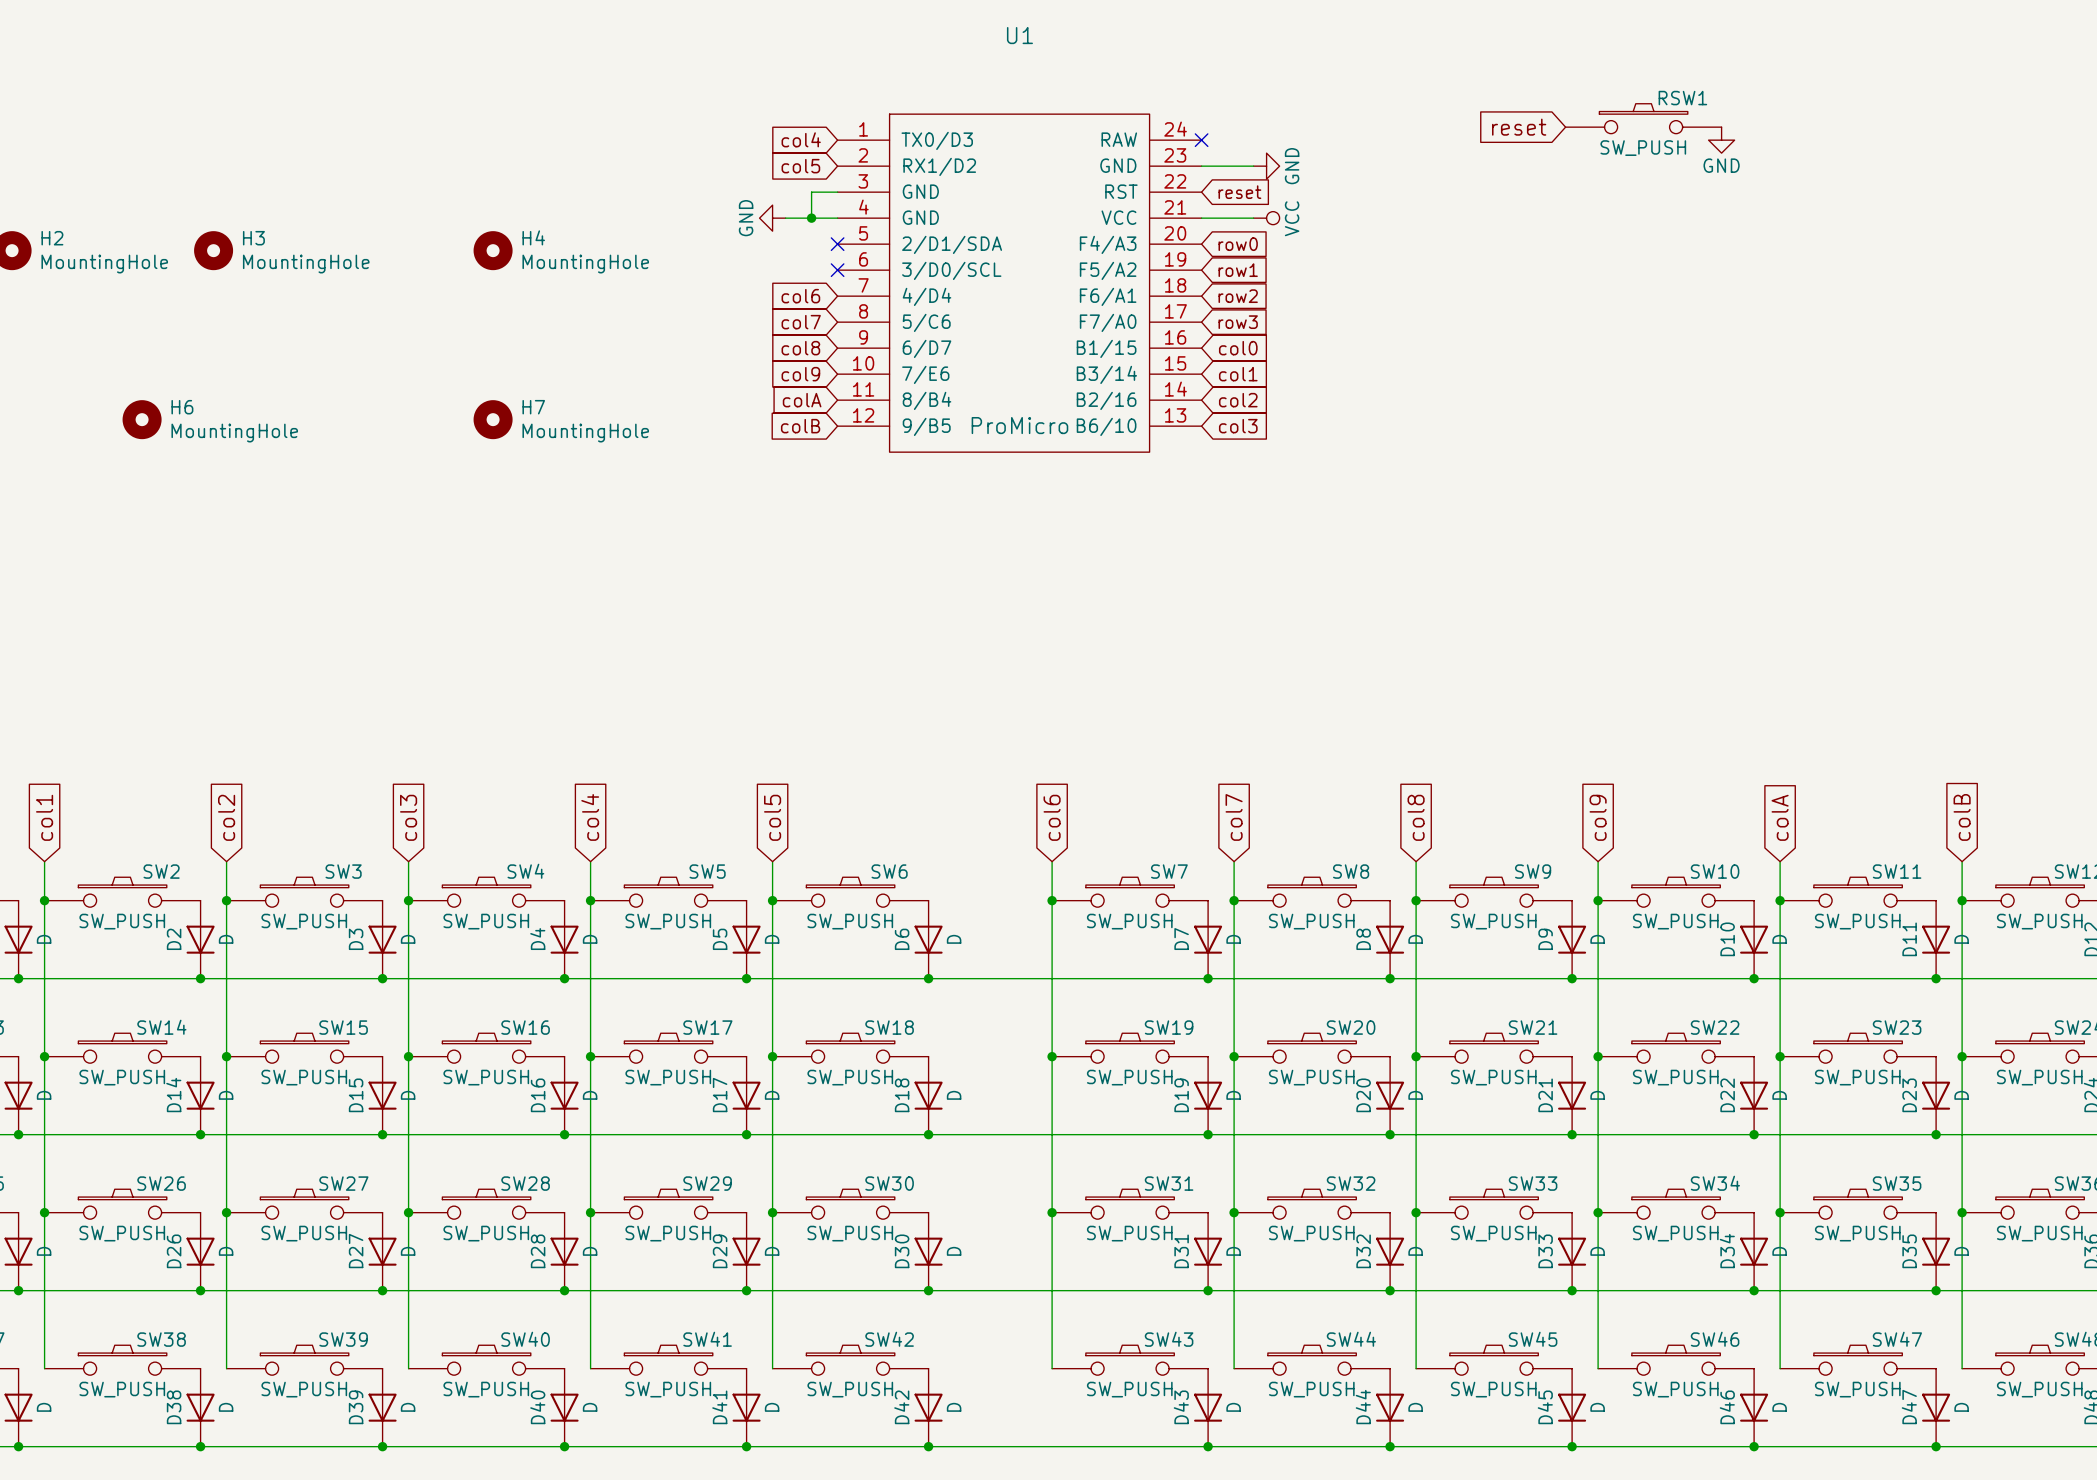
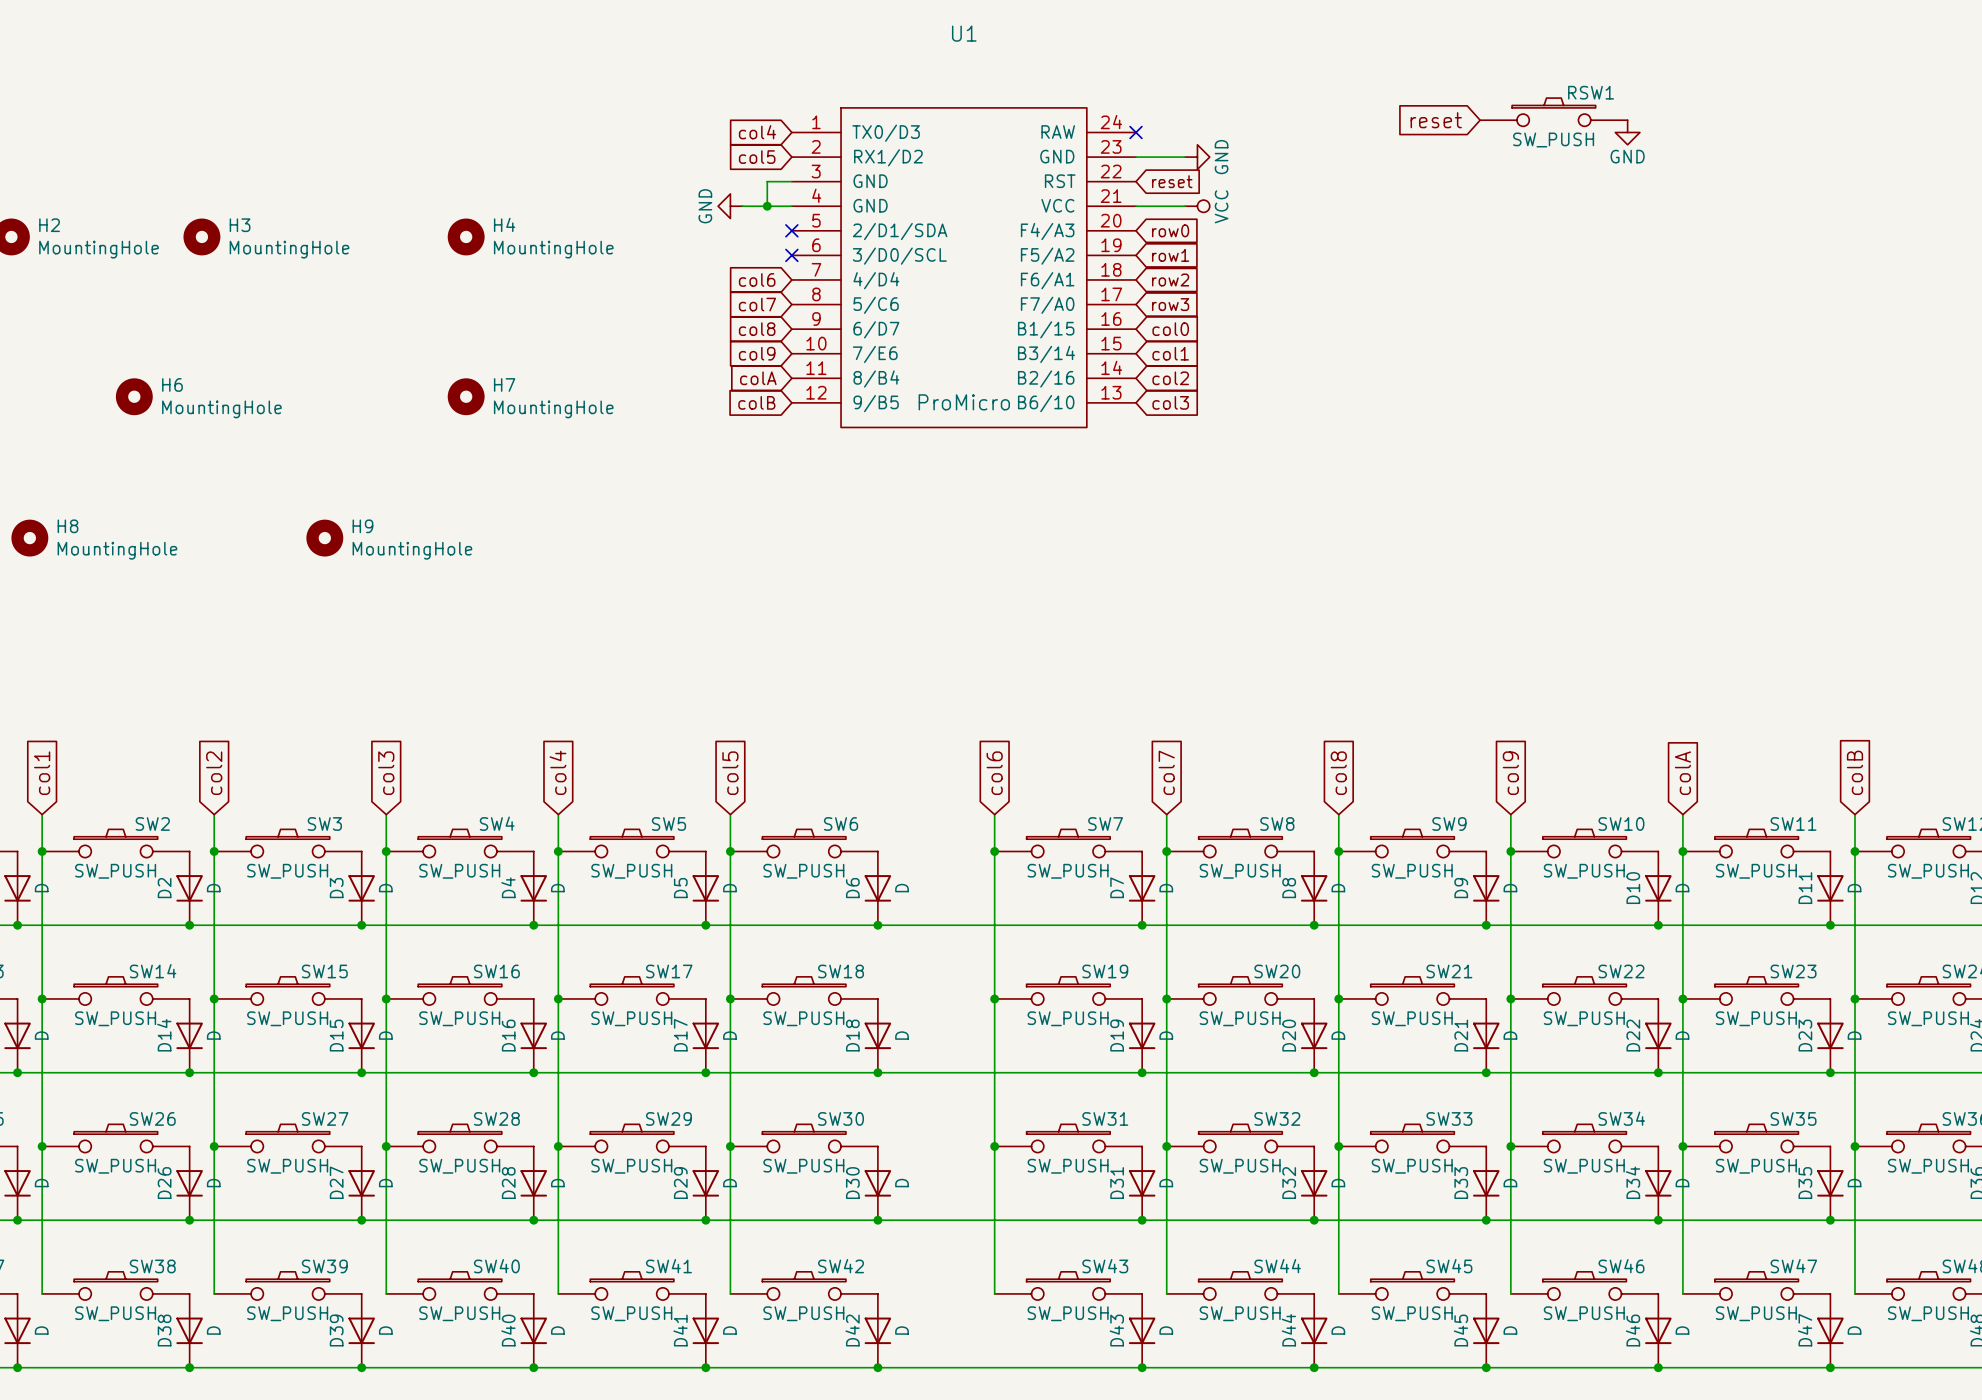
H8: none -> MountingHole (29, 538)
H9: none -> MountingHole (324, 538)

